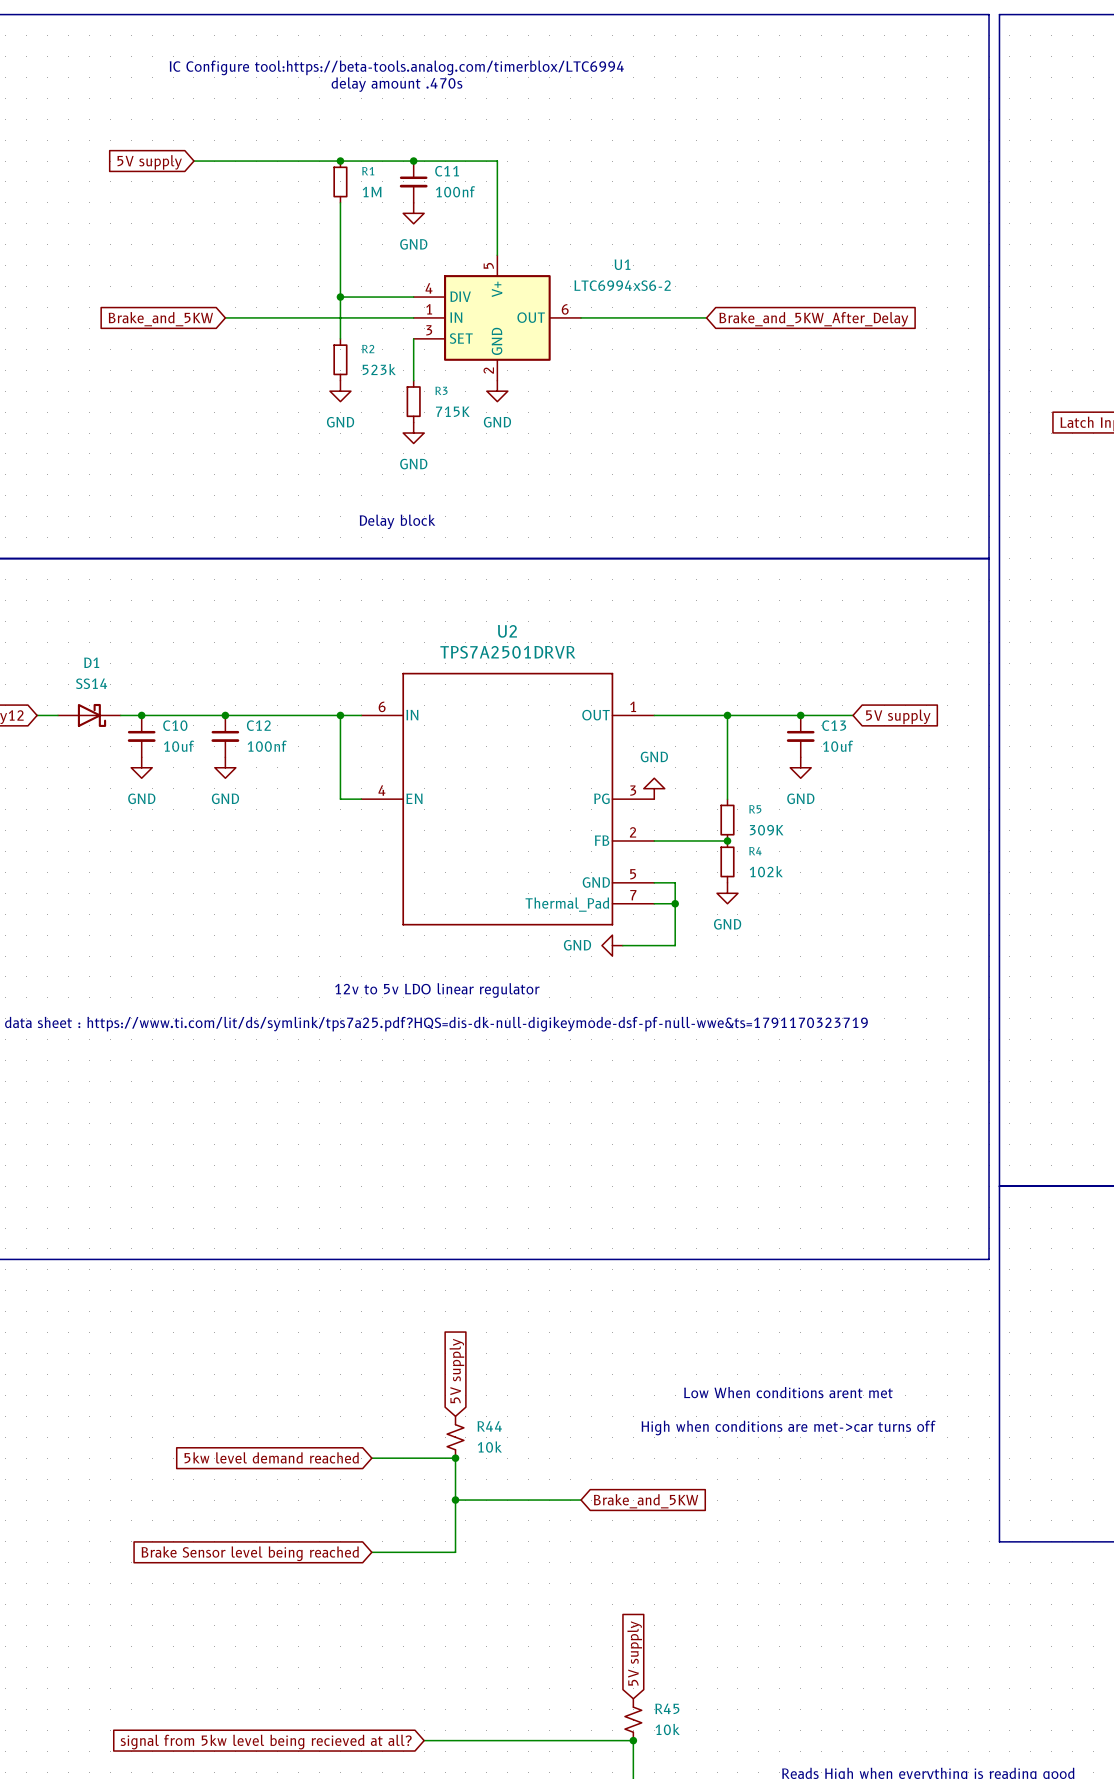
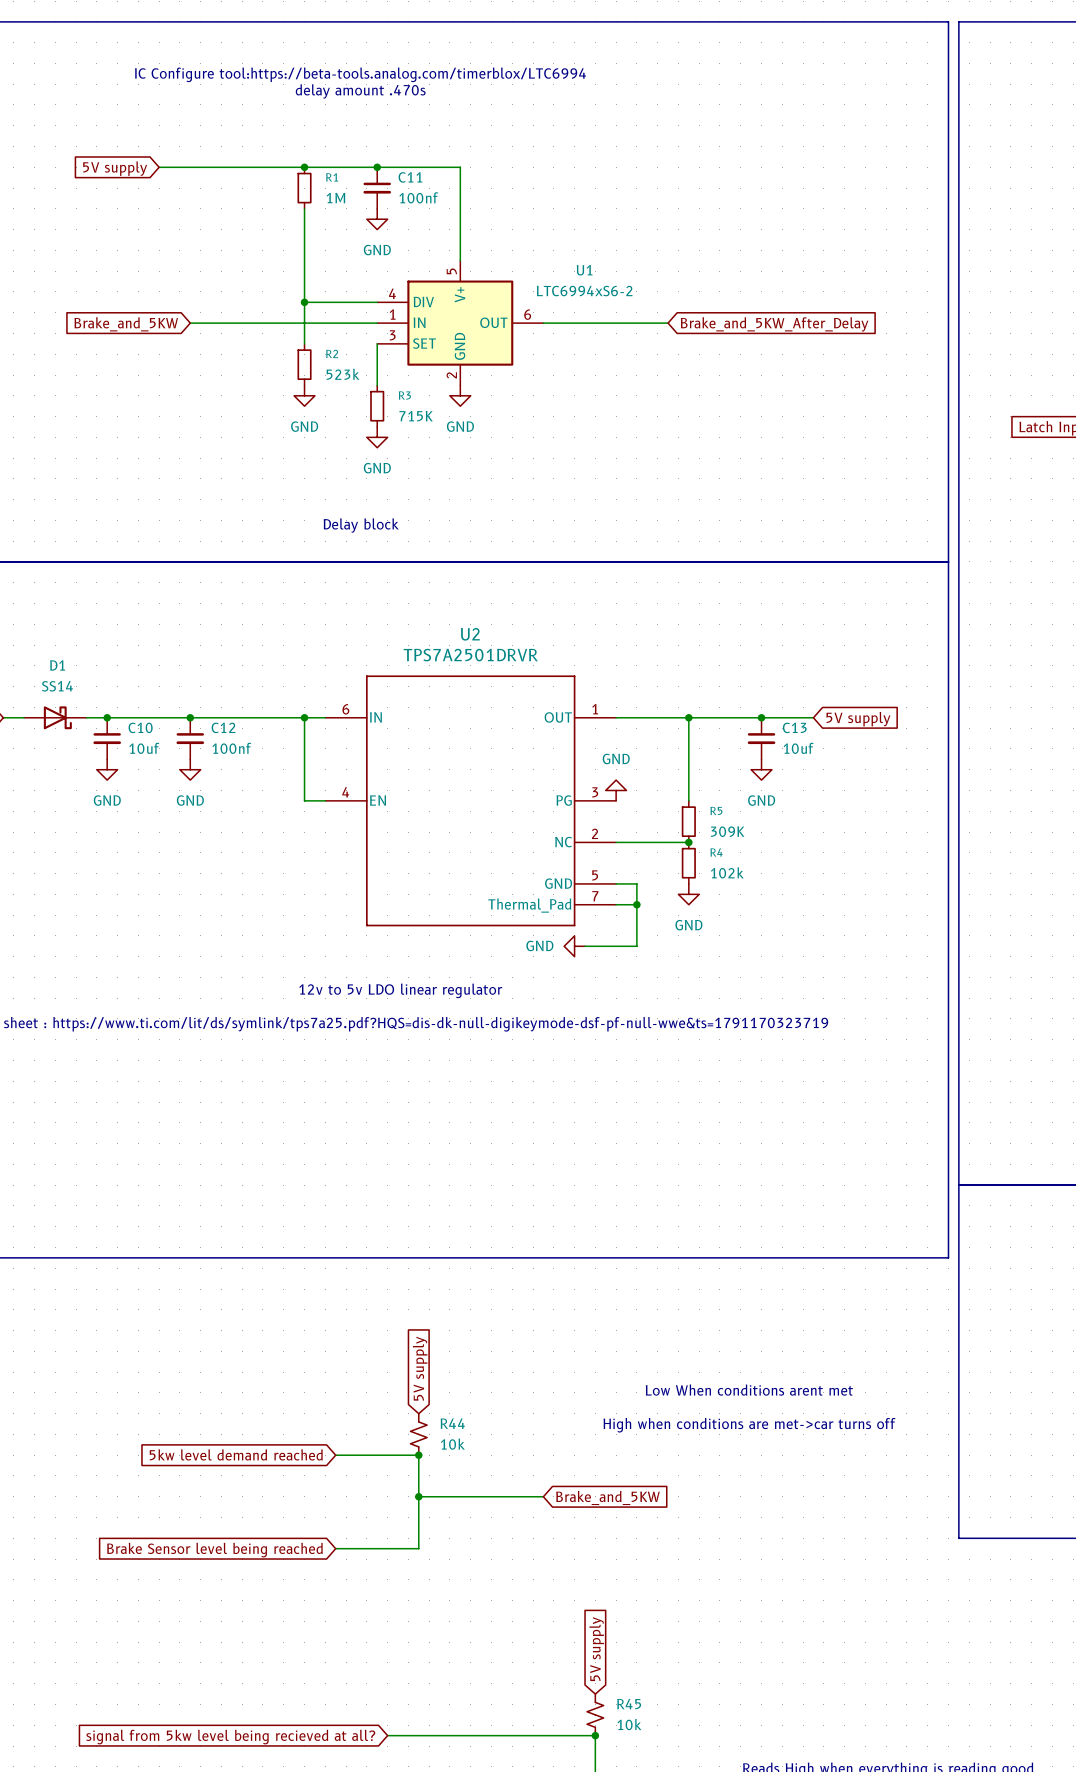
U2 pin name: FB (602, 840) -> NC (563, 842)

